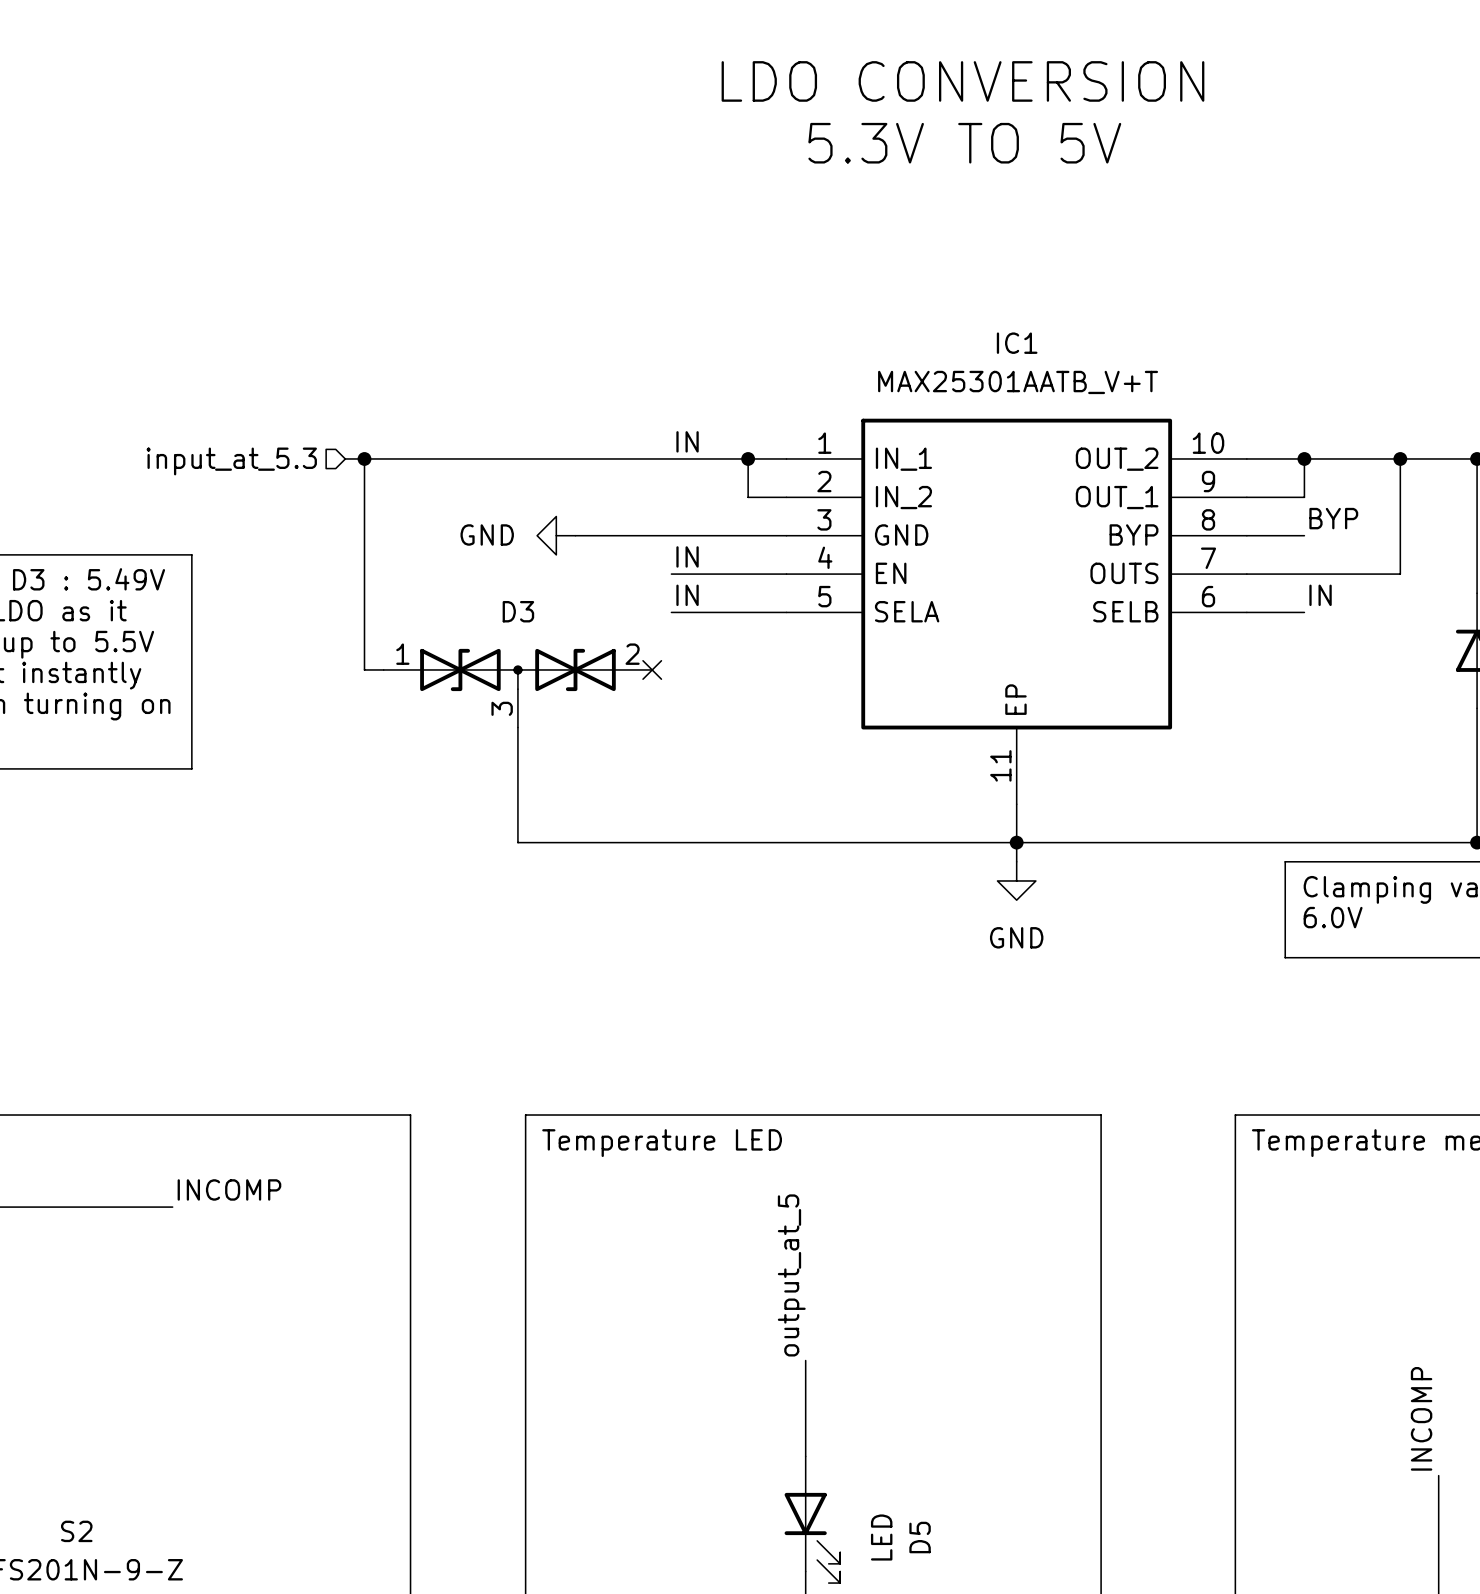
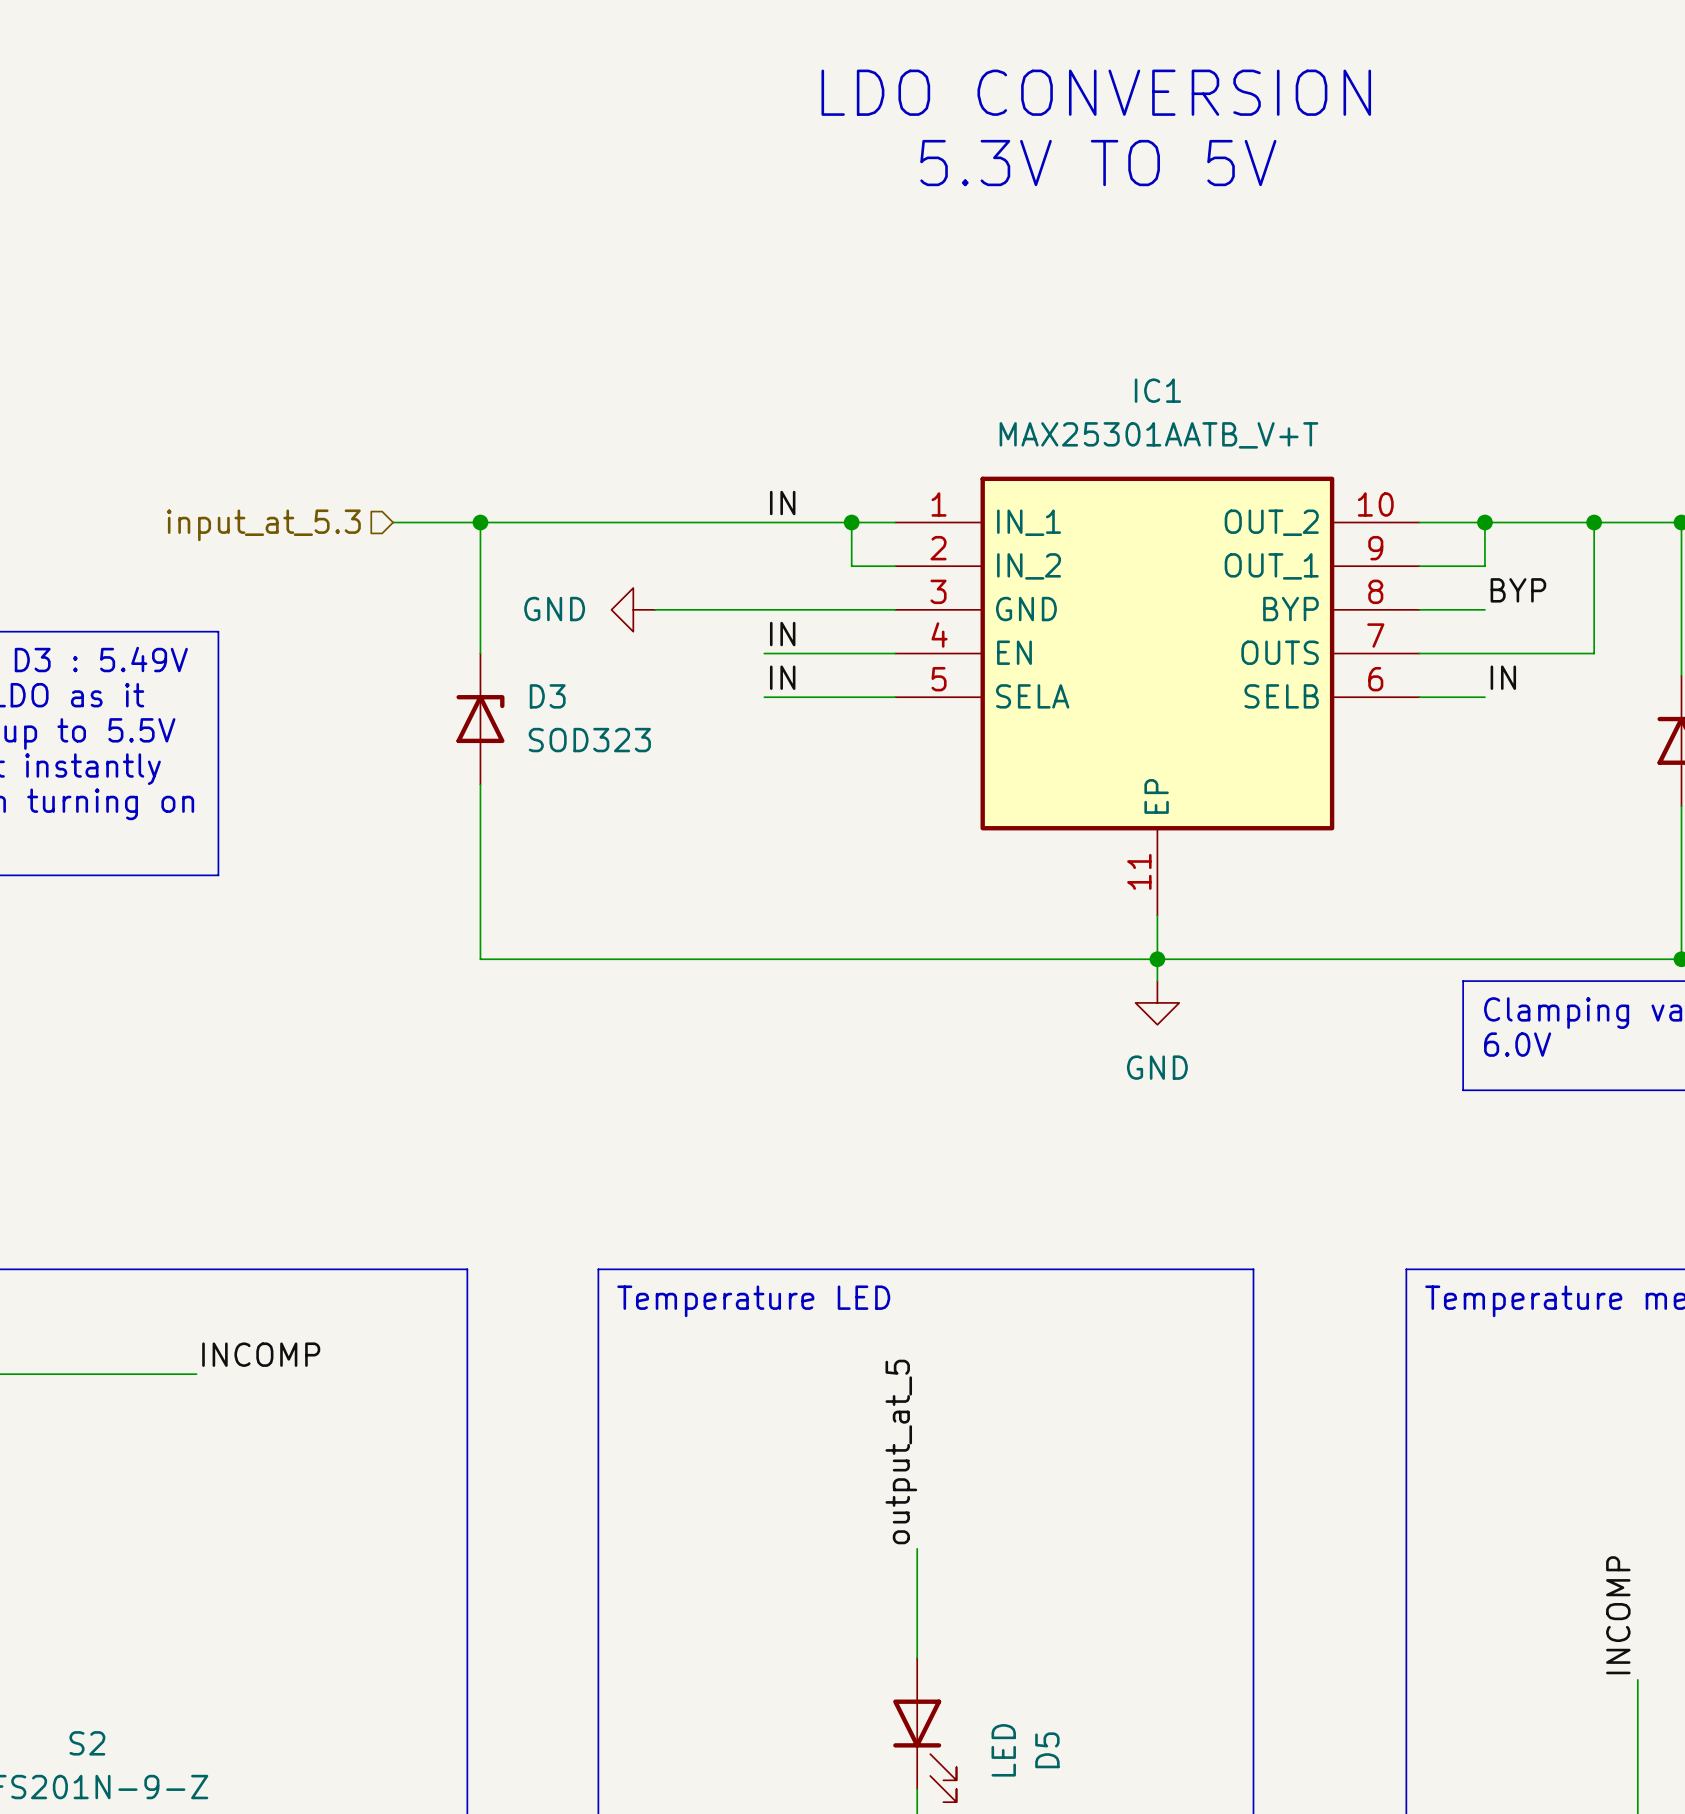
wire: (364, 458) (364, 669) (383, 669) -> none
junction position: (364, 458) -> (480, 522)
wire: none -> (480, 522) (480, 653)
D3 name position: D3 (518, 611) -> D3 (547, 696)
D3 symbol: [383, 648, 653, 728] -> [456, 653, 505, 785]
D3 value: none -> SOD323 (589, 740)
no-connect mark: (652, 669) -> none
wire: (517, 727) (517, 842) -> (480, 784) (480, 959) (589, 959)

